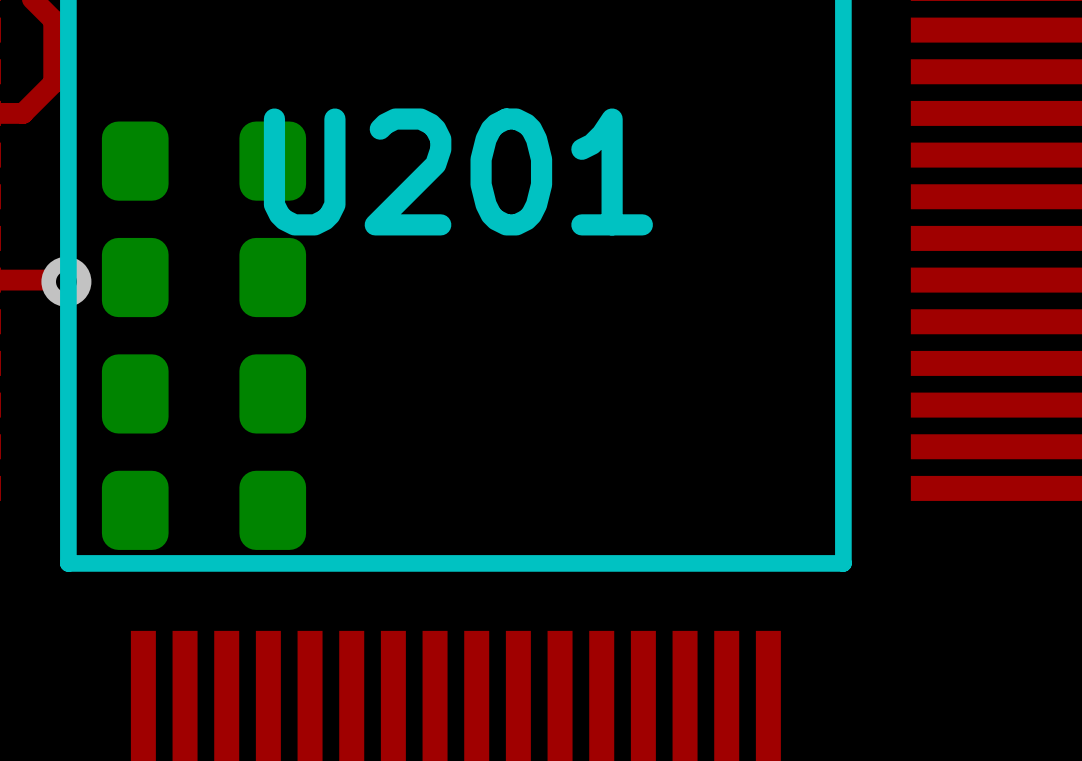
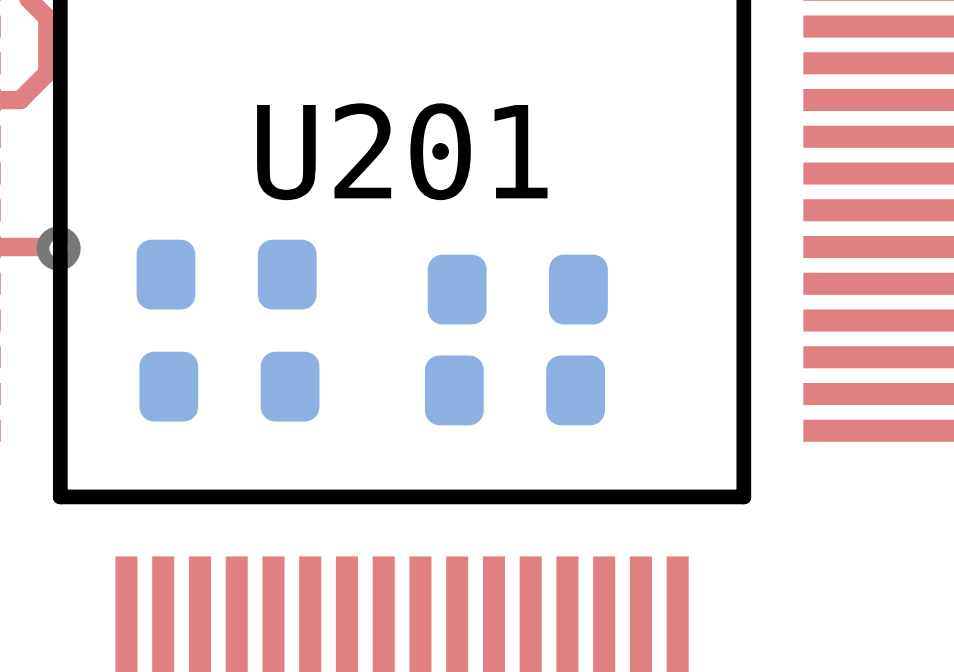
part: (204, 161) -> none
part: (204, 277) -> none
part: none -> (226, 274)
part: none -> (517, 289)
part: (204, 393) -> none
part: none -> (229, 386)
part: none -> (514, 390)
part: (204, 510) -> none

